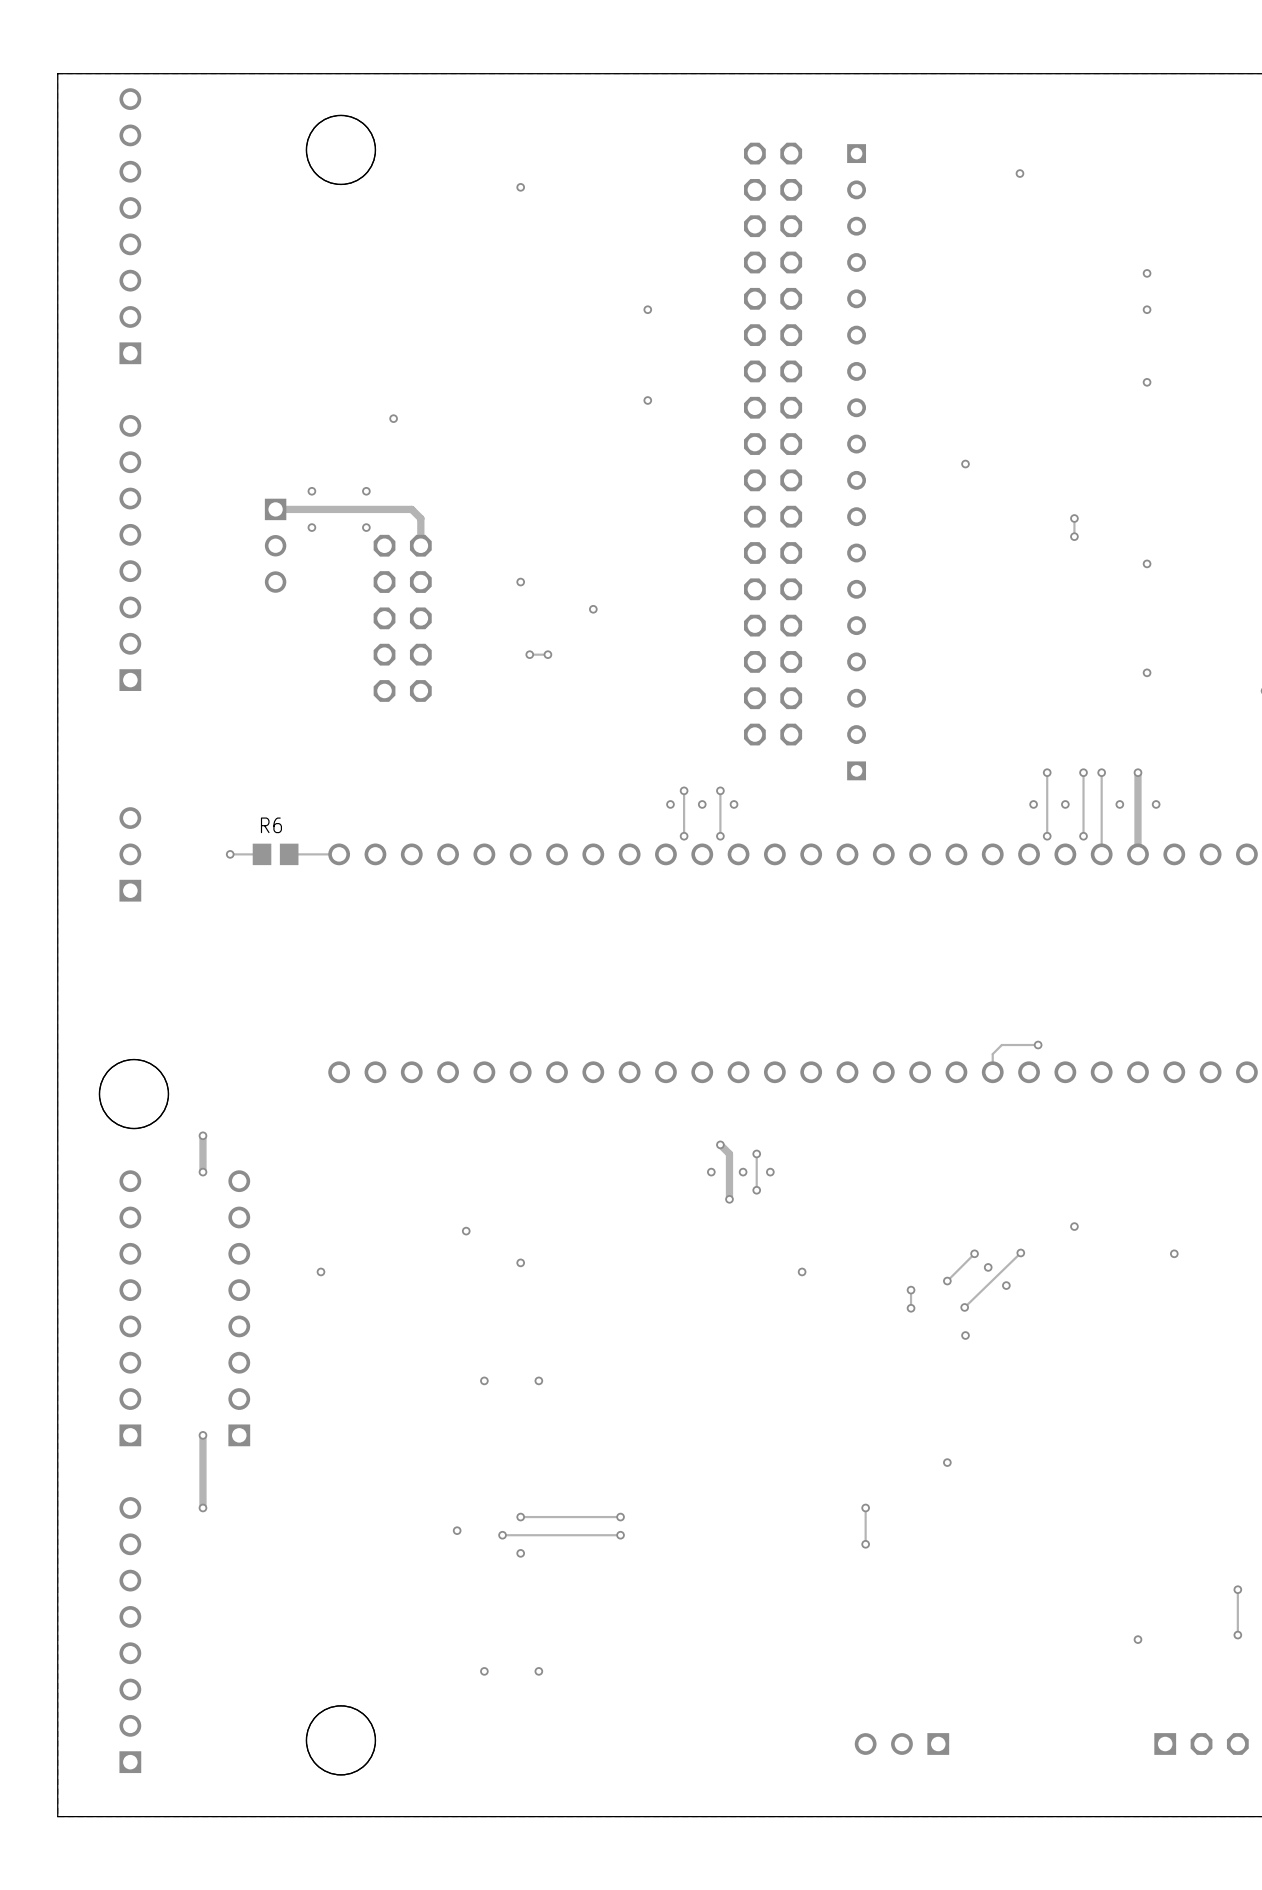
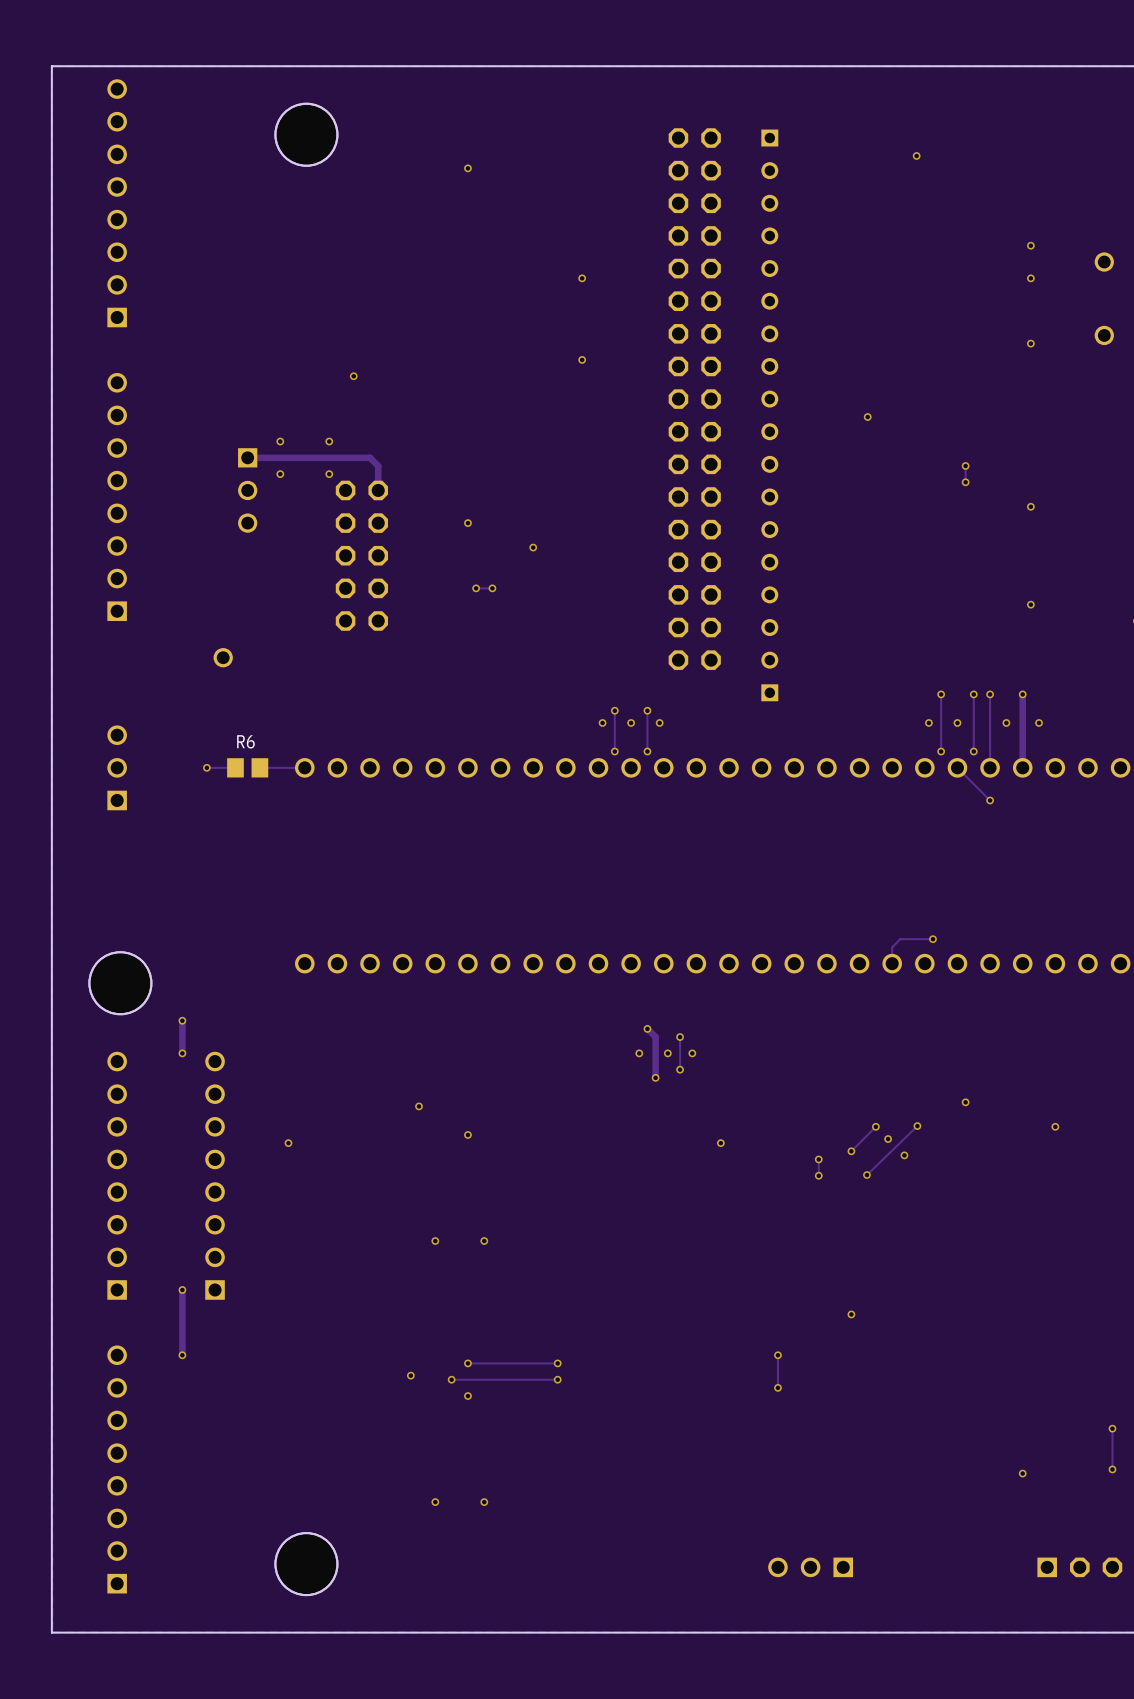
part: none -> (1104, 262)
part: none -> (1104, 335)
part: none -> (223, 657)
track: none -> (957, 767) (990, 800)
via: none -> (990, 800)
via: (965, 1335) -> none

